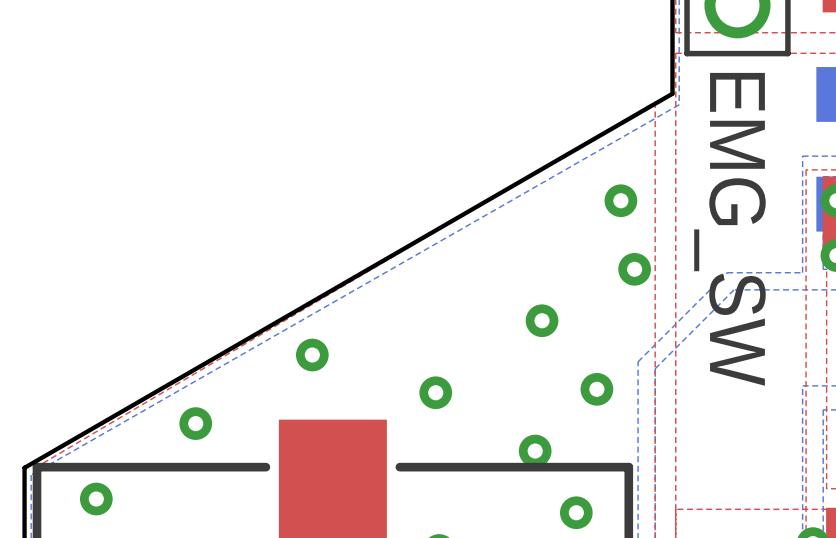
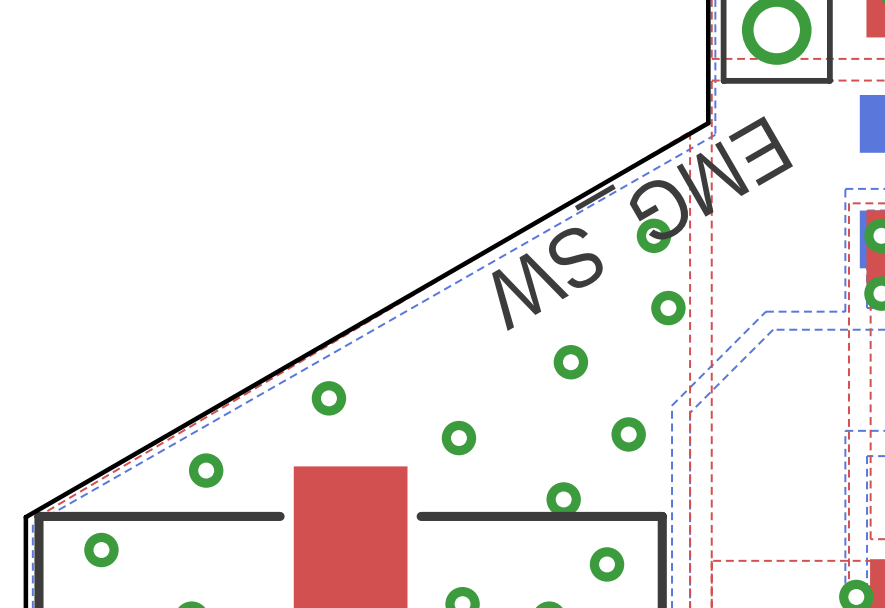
text rotation: 0° (729, 229) -> 60° clockwise (642, 223)

